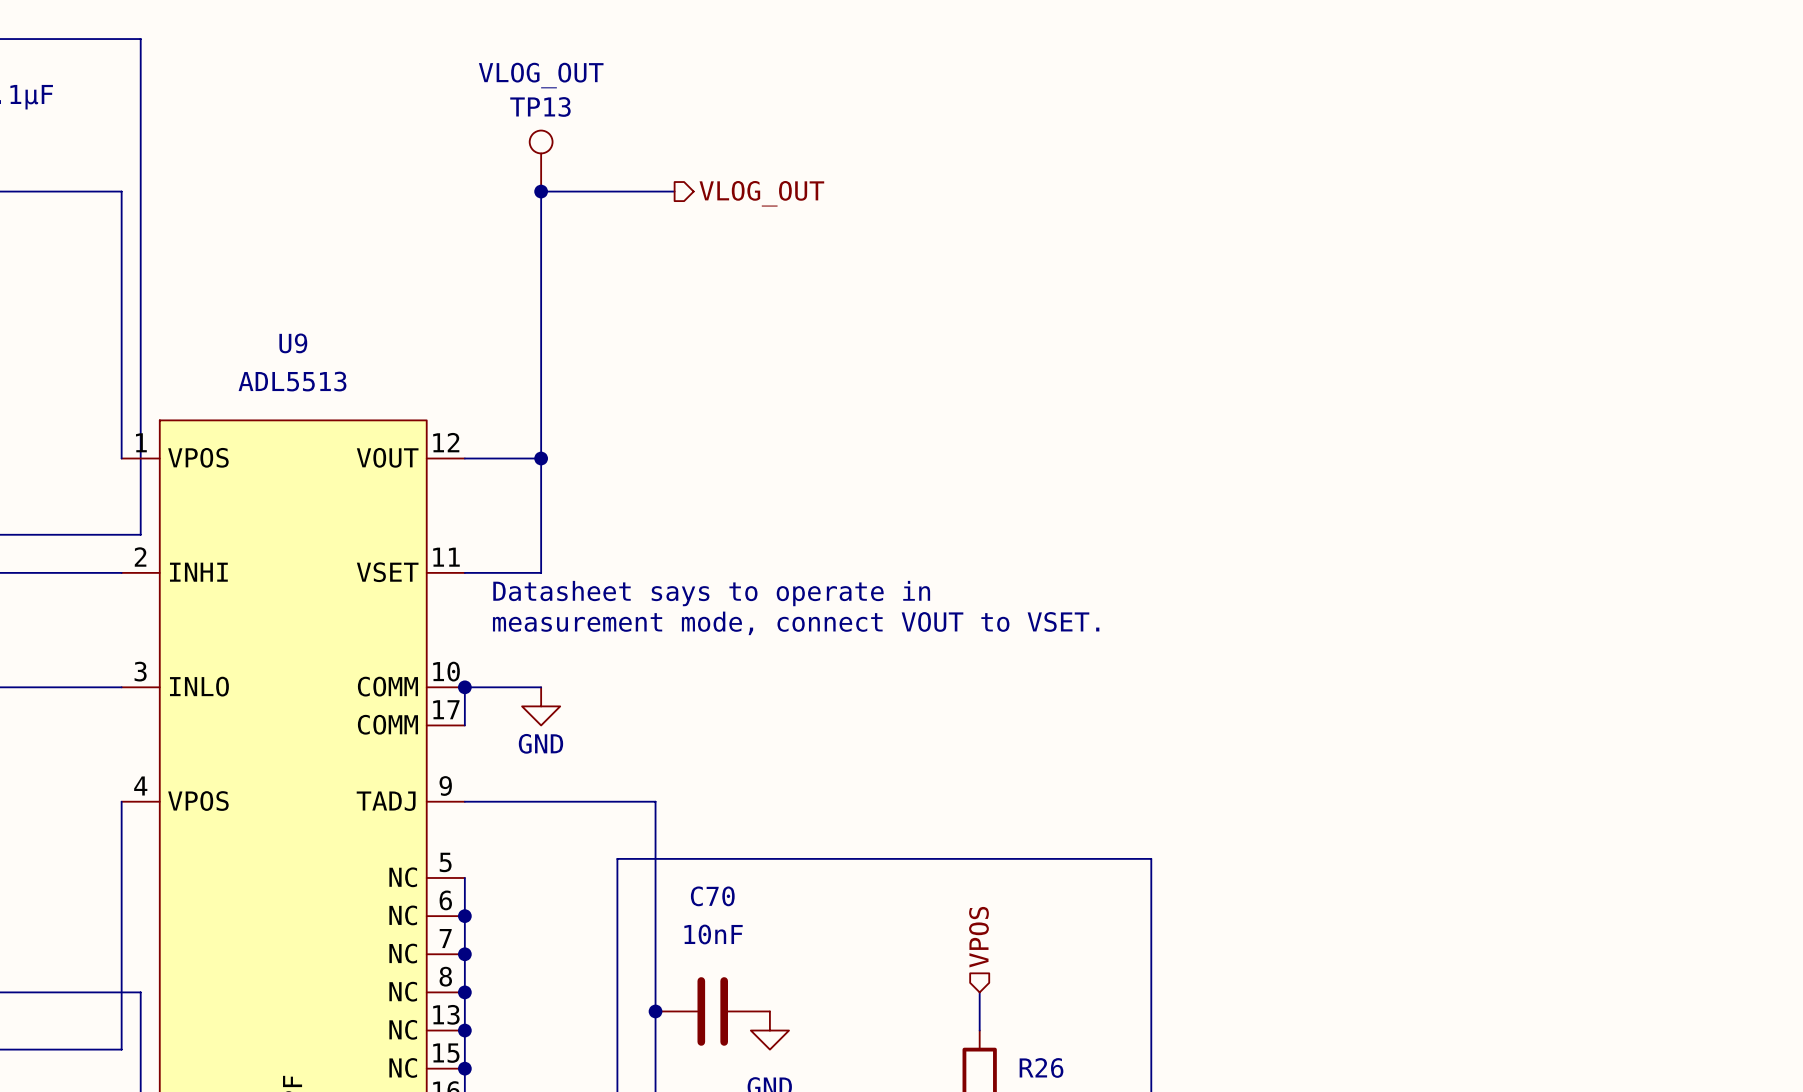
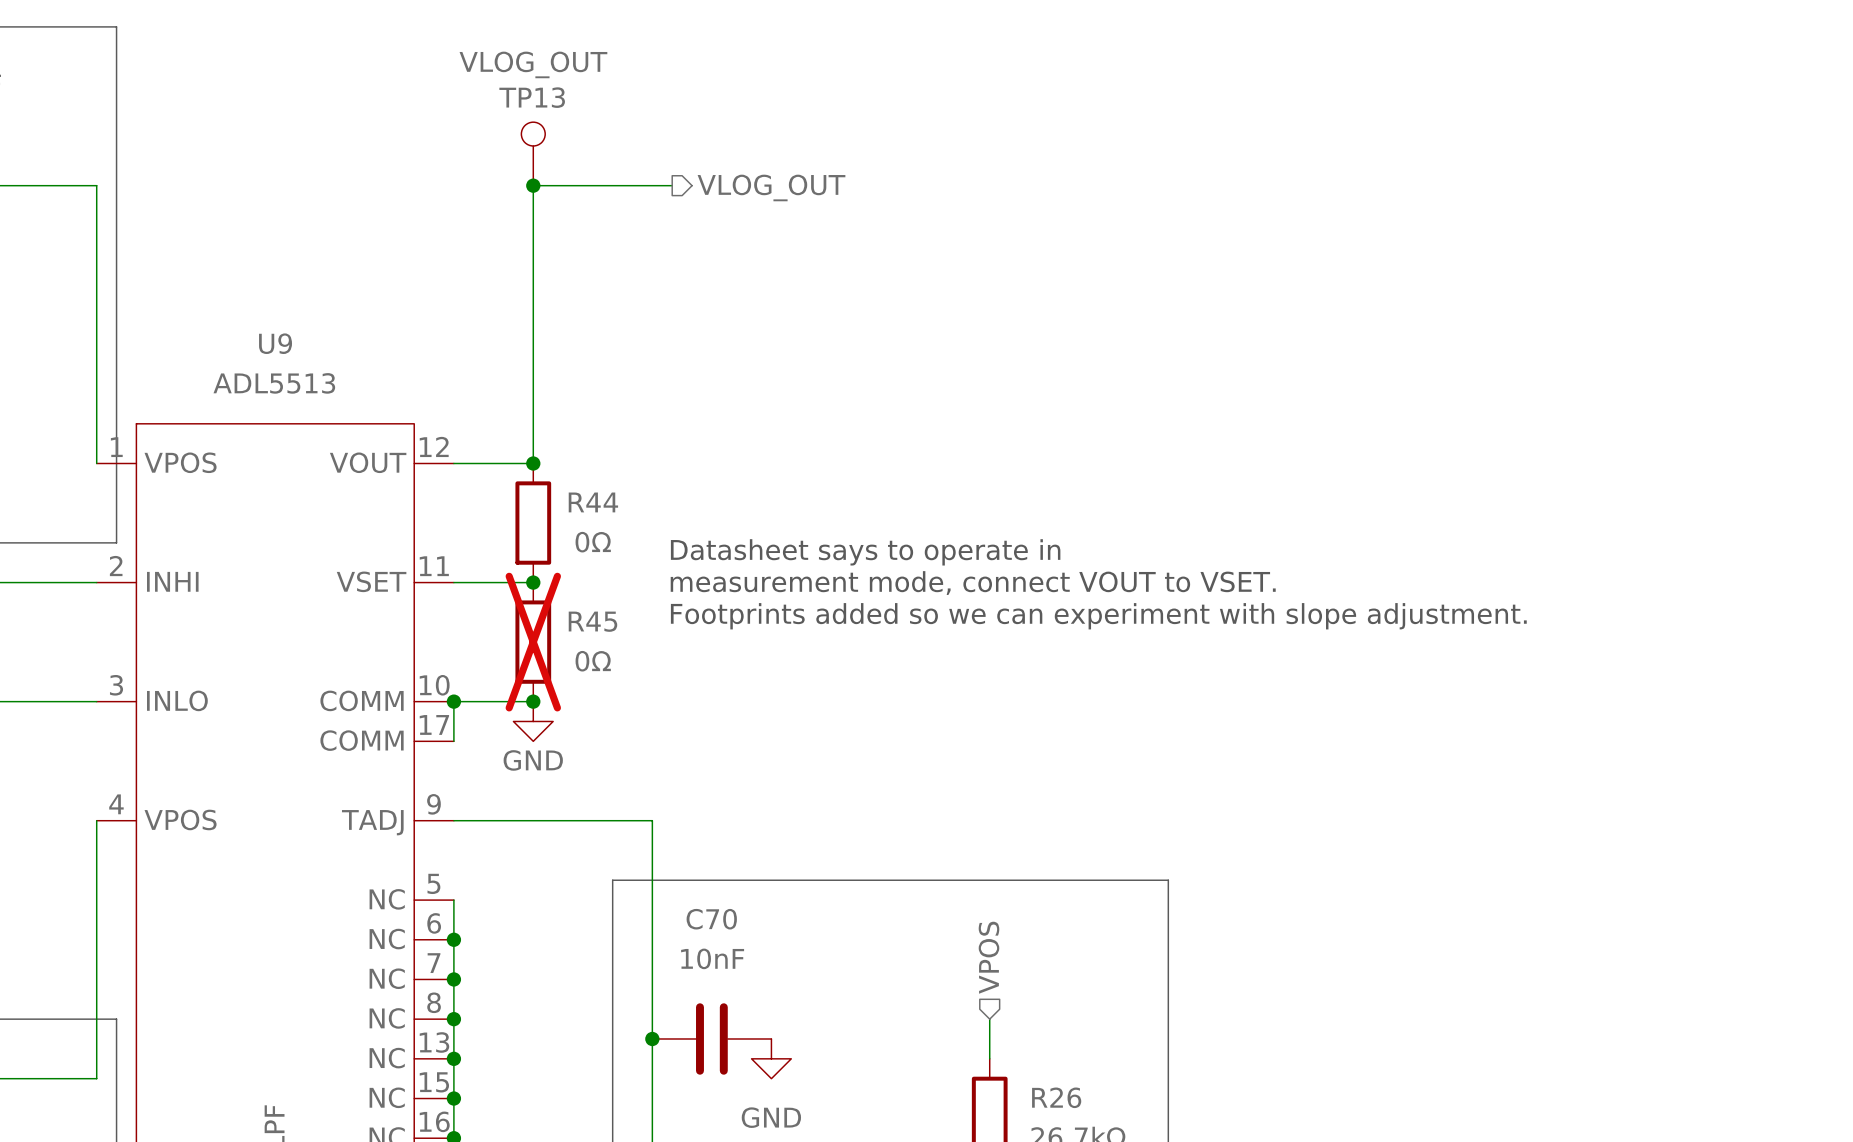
wire: (541, 458) (541, 572) -> none
R44: none -> 0Ω (533, 523)
junction: none -> (533, 582)
text position: Datasheet says to operate in (711, 593) -> Datasheet says to operate in (865, 552)
text: none -> Footprints added so we can experiment with slope adjustment. (1098, 616)
text position: measurement mode, connect VOUT to VSET. (796, 623) -> measurement mode, connect VOUT to VSET. (973, 583)
R45: none -> 0Ω (533, 642)
junction: none -> (533, 701)

